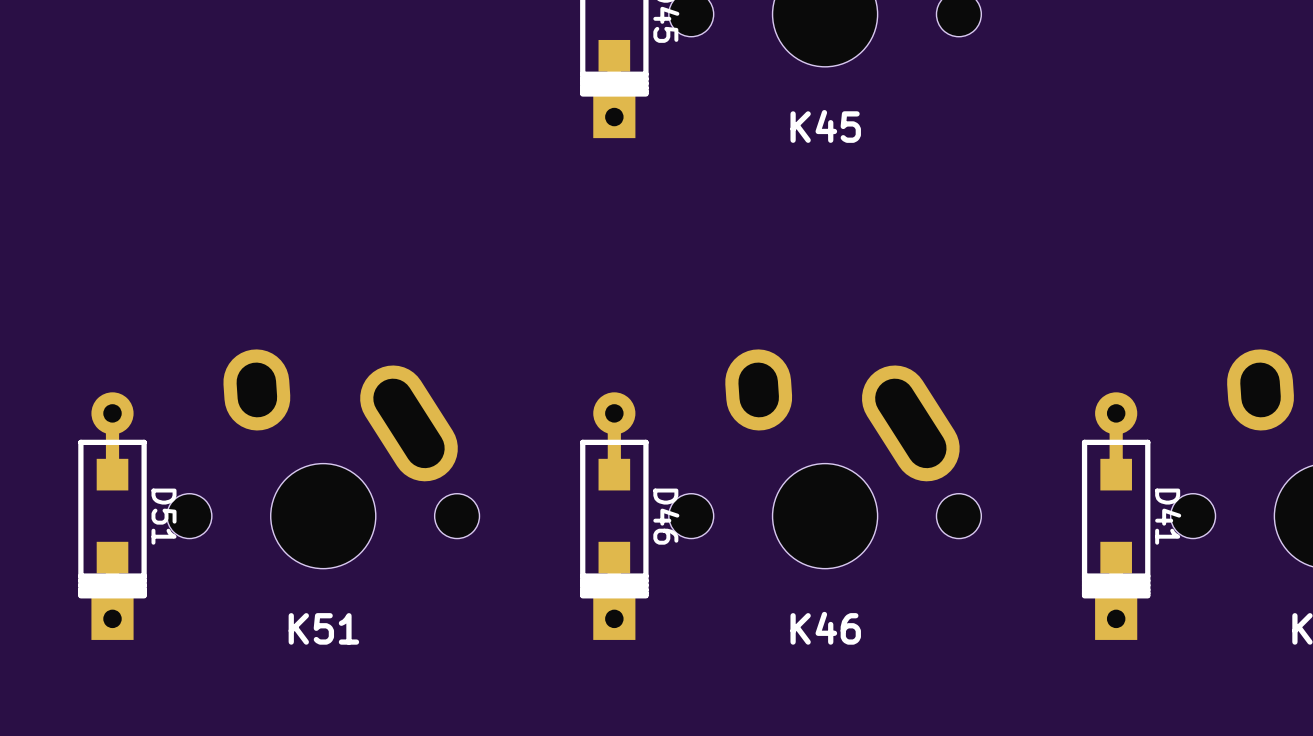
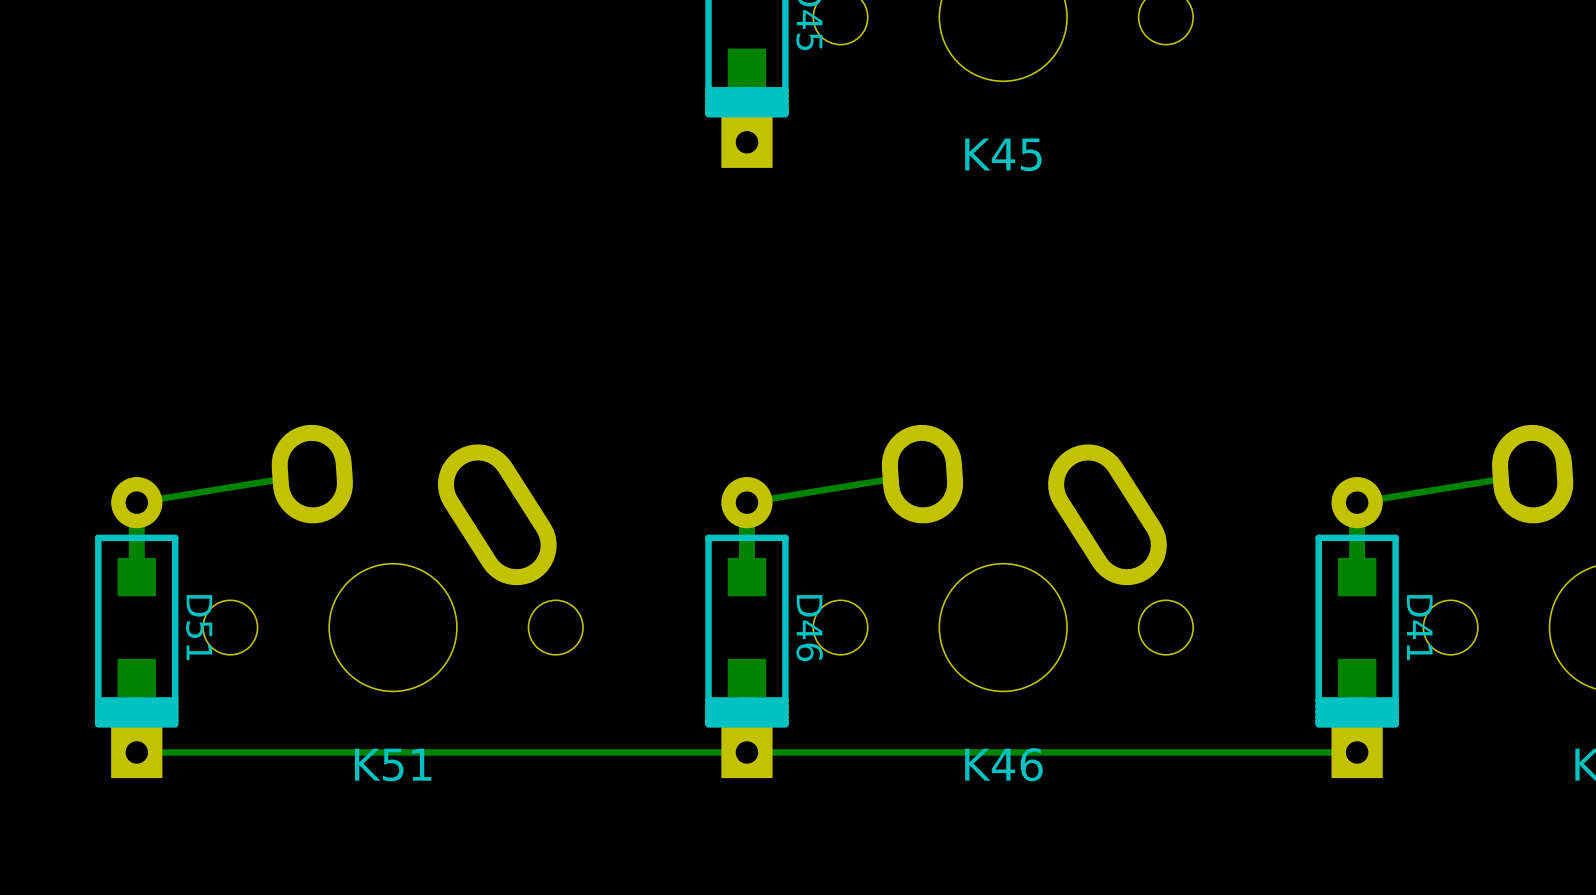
track: none -> (311, 474) (136, 502)
track: none -> (921, 474) (746, 502)
track: none -> (1532, 474) (1357, 502)
track: none -> (1357, 752) (136, 752)

